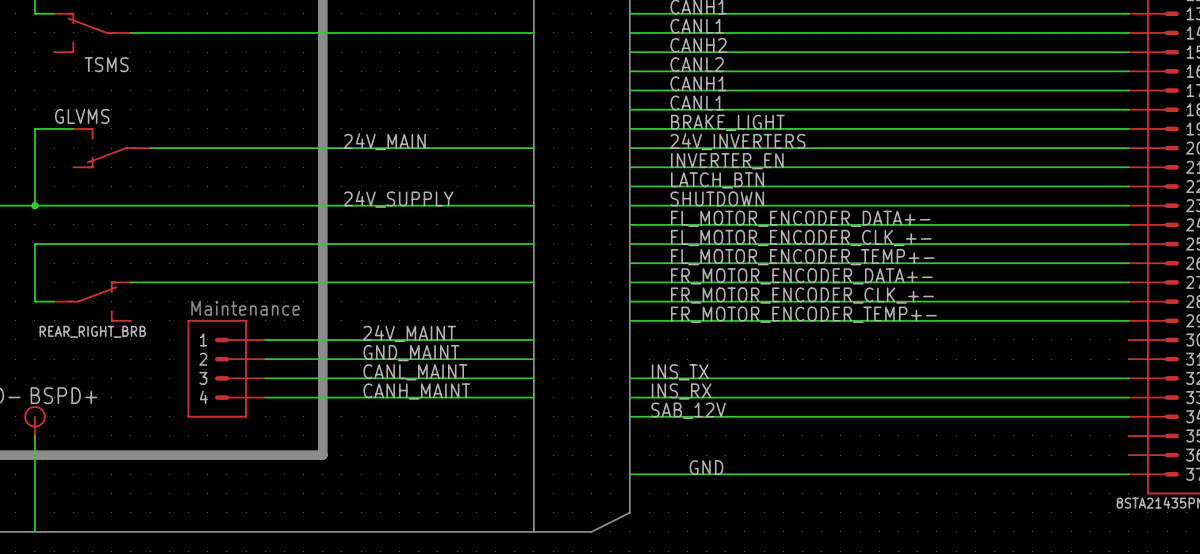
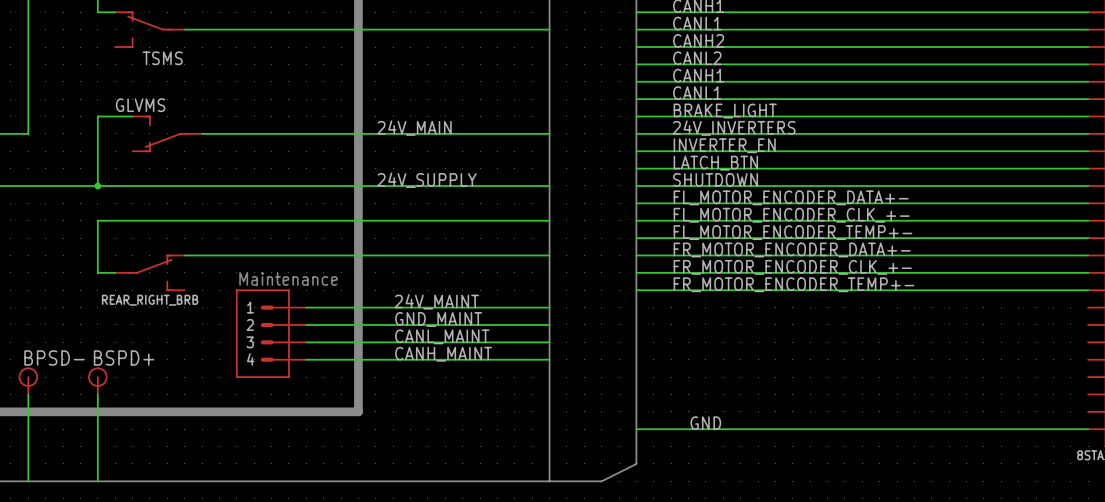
label: INS_TX (680, 372) -> none
wire: (629, 378) (1128, 378) -> none
label: INS_RX (681, 391) -> none
wire: (629, 397) (1128, 397) -> none
label: SAB_12V (688, 410) -> none
wire: (629, 416) (1128, 416) -> none

